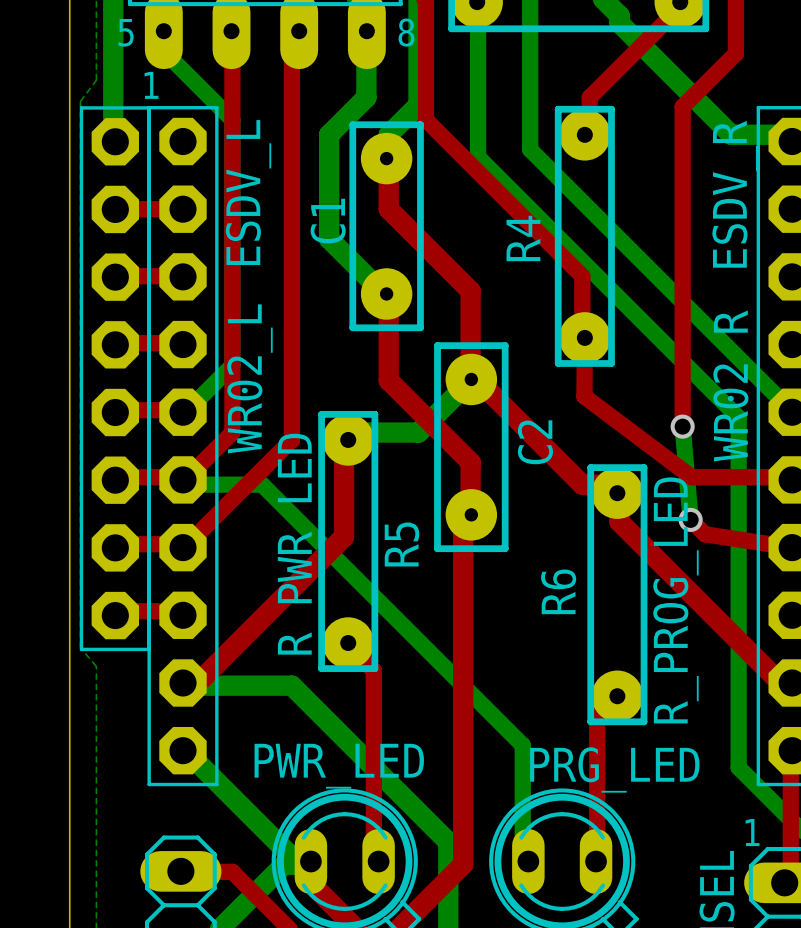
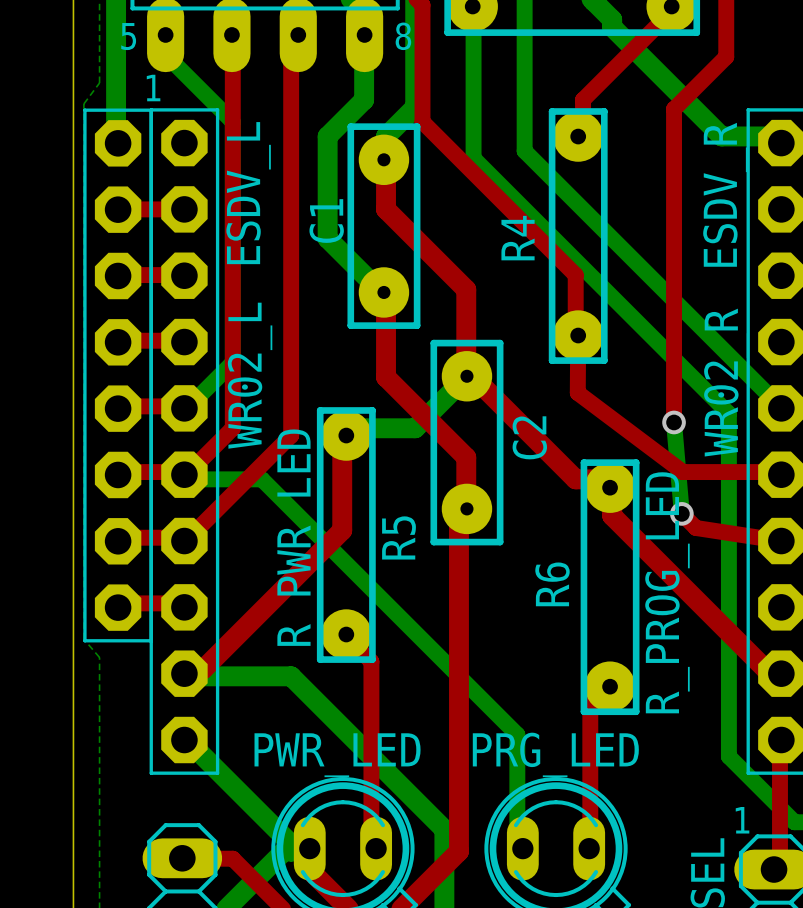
part value position: PRG_LED (614, 769) -> PRG_LED (555, 754)

